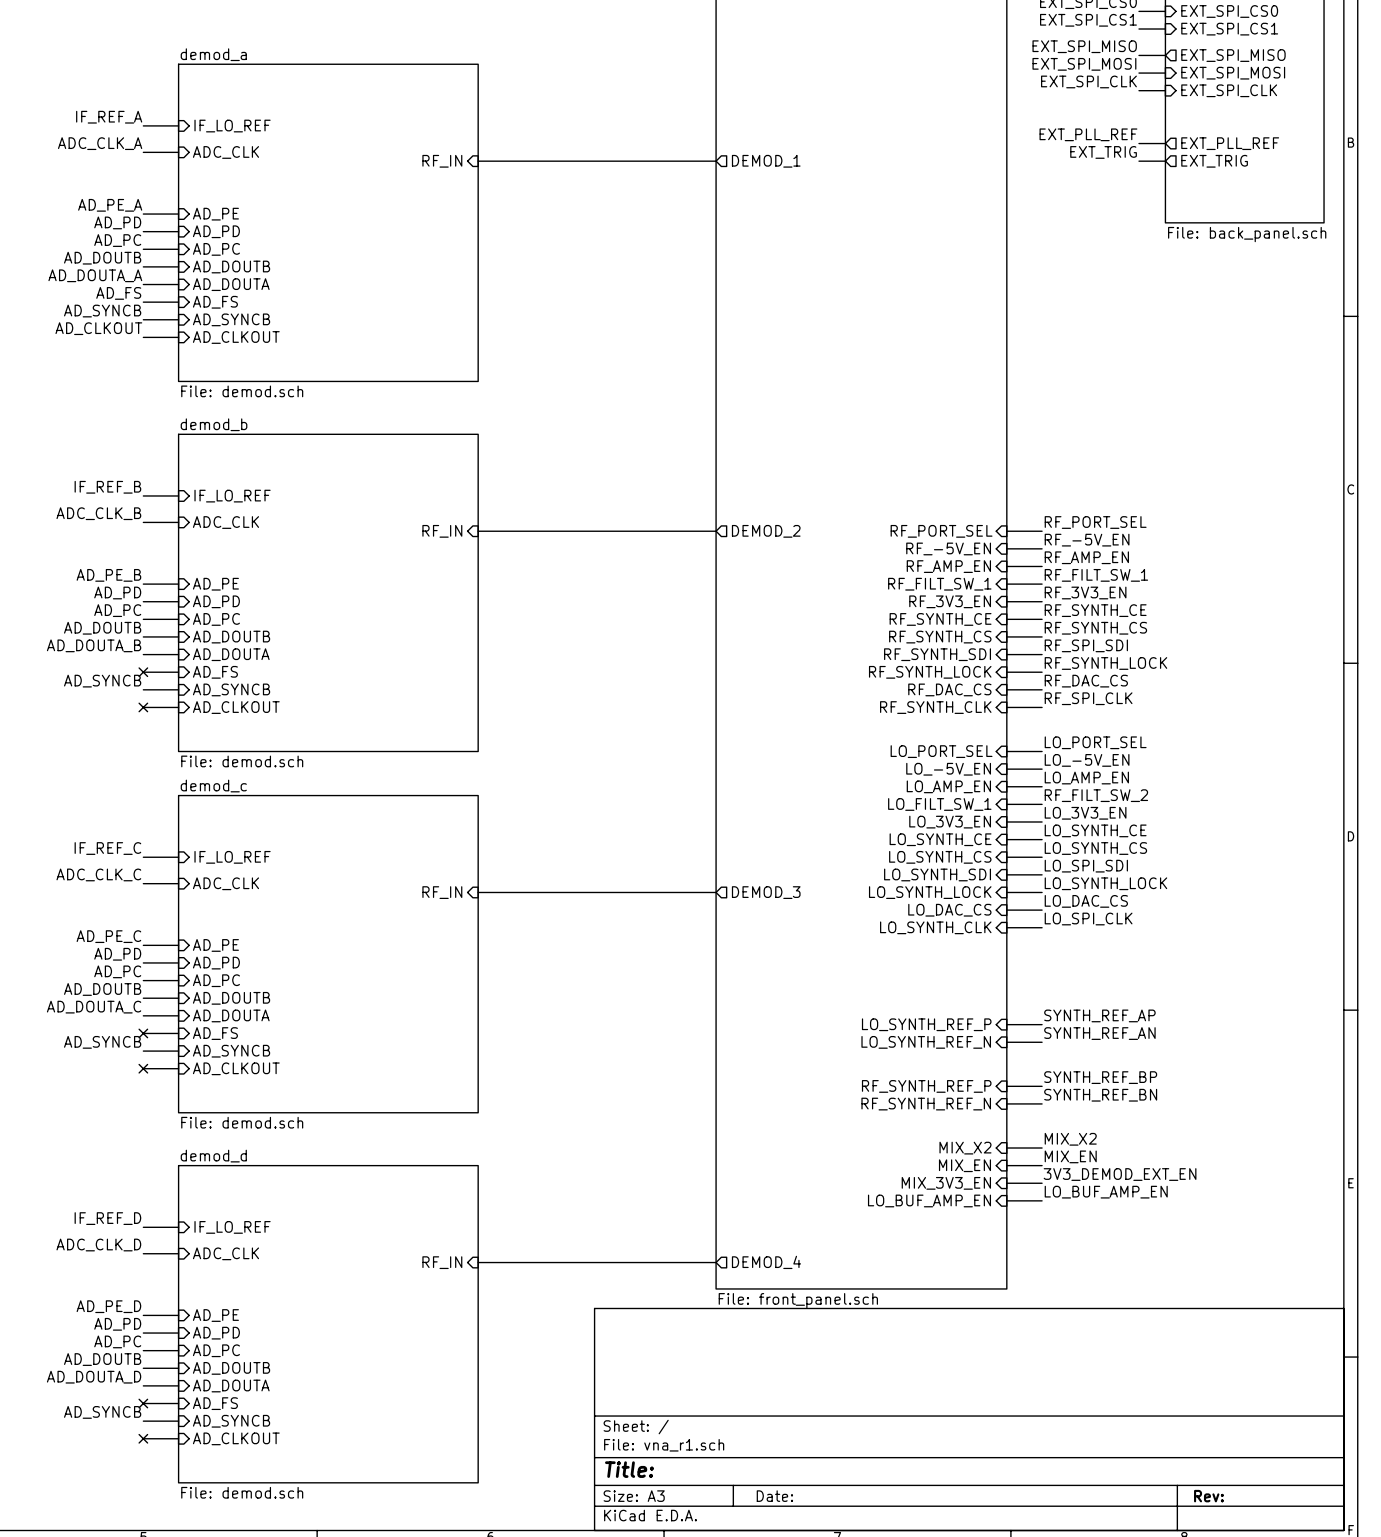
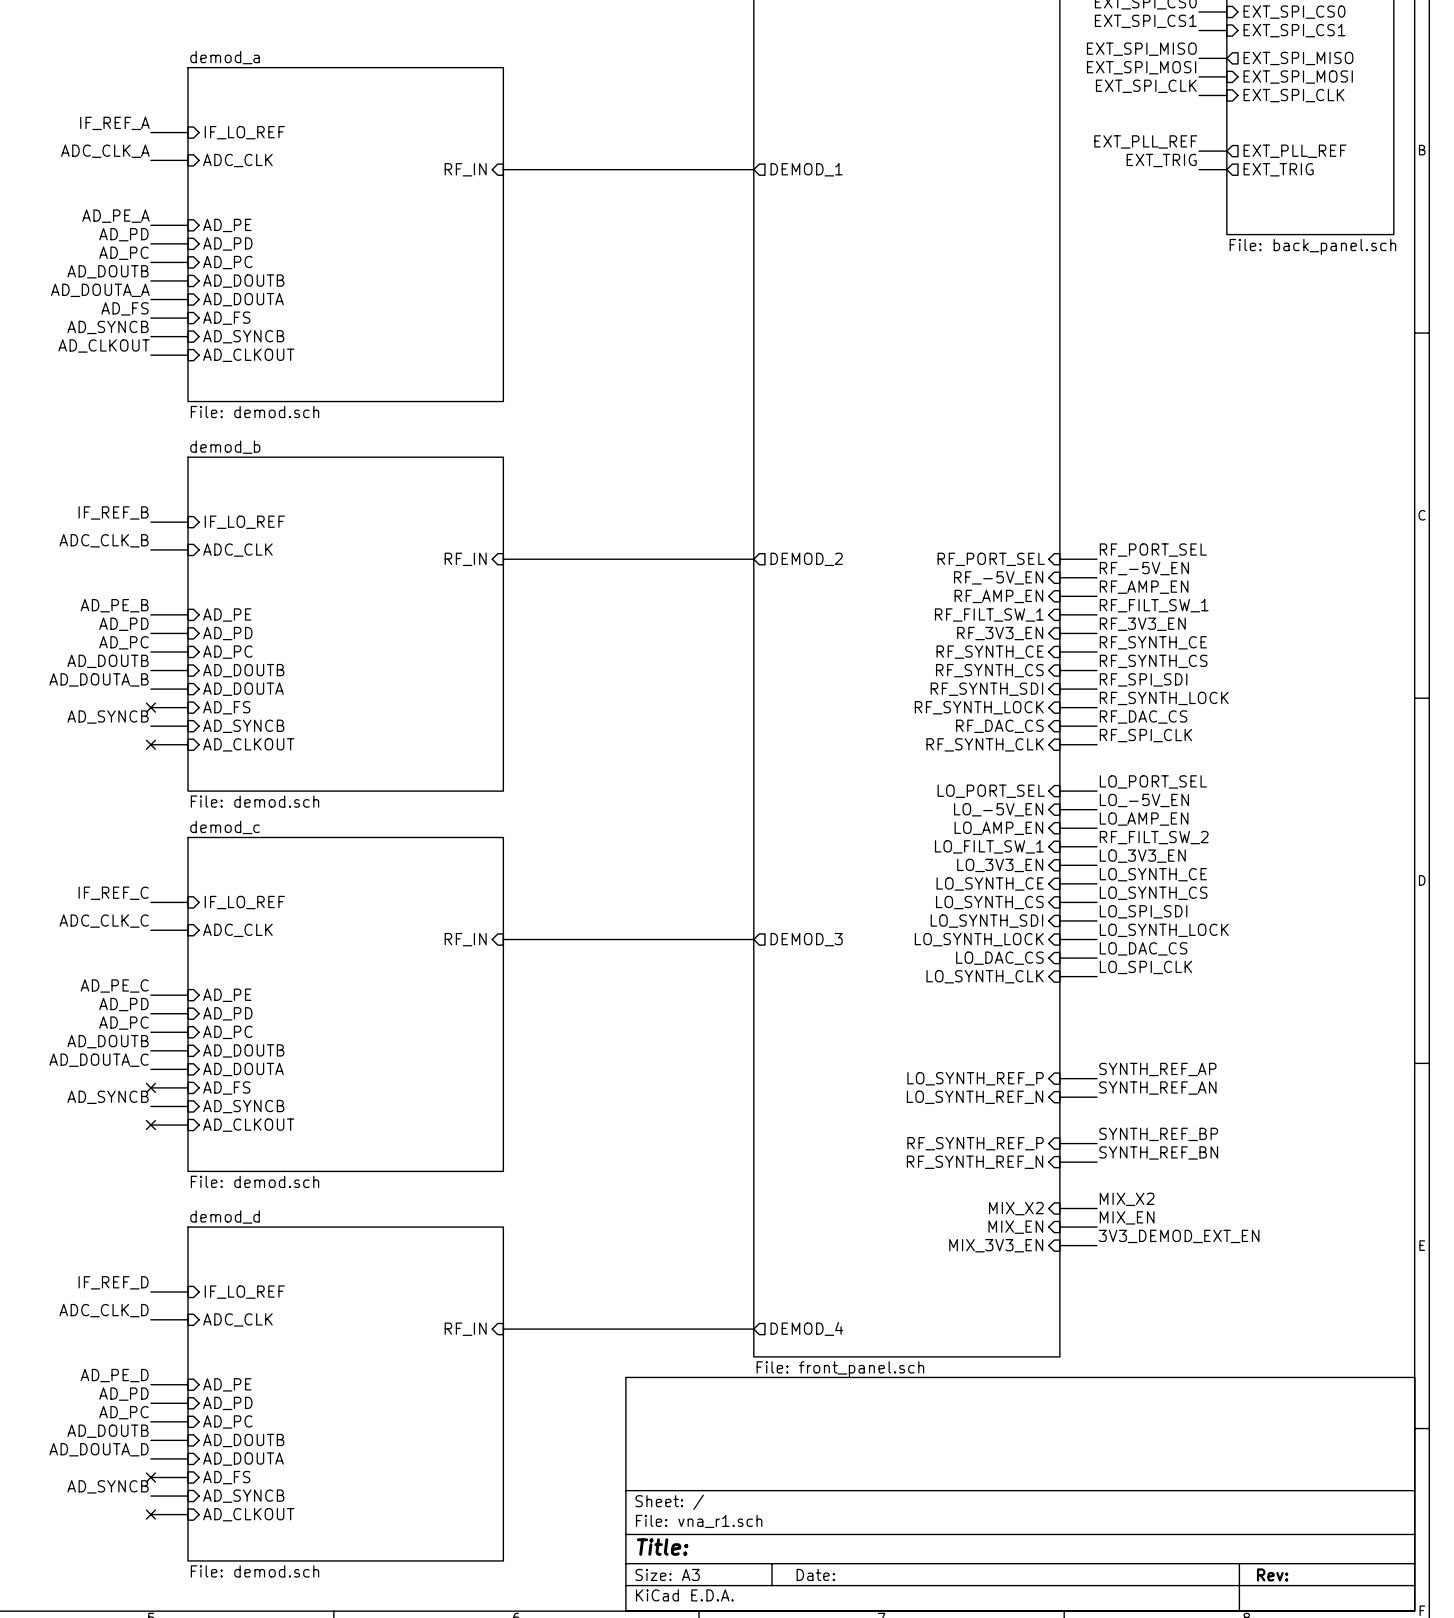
label: LO_BUF_AMP_EN (1106, 1192) -> none
sheet pin: LO_BUF_AMP_EN (929, 1200) -> none
wire: (1006, 1200) (1042, 1200) -> none

